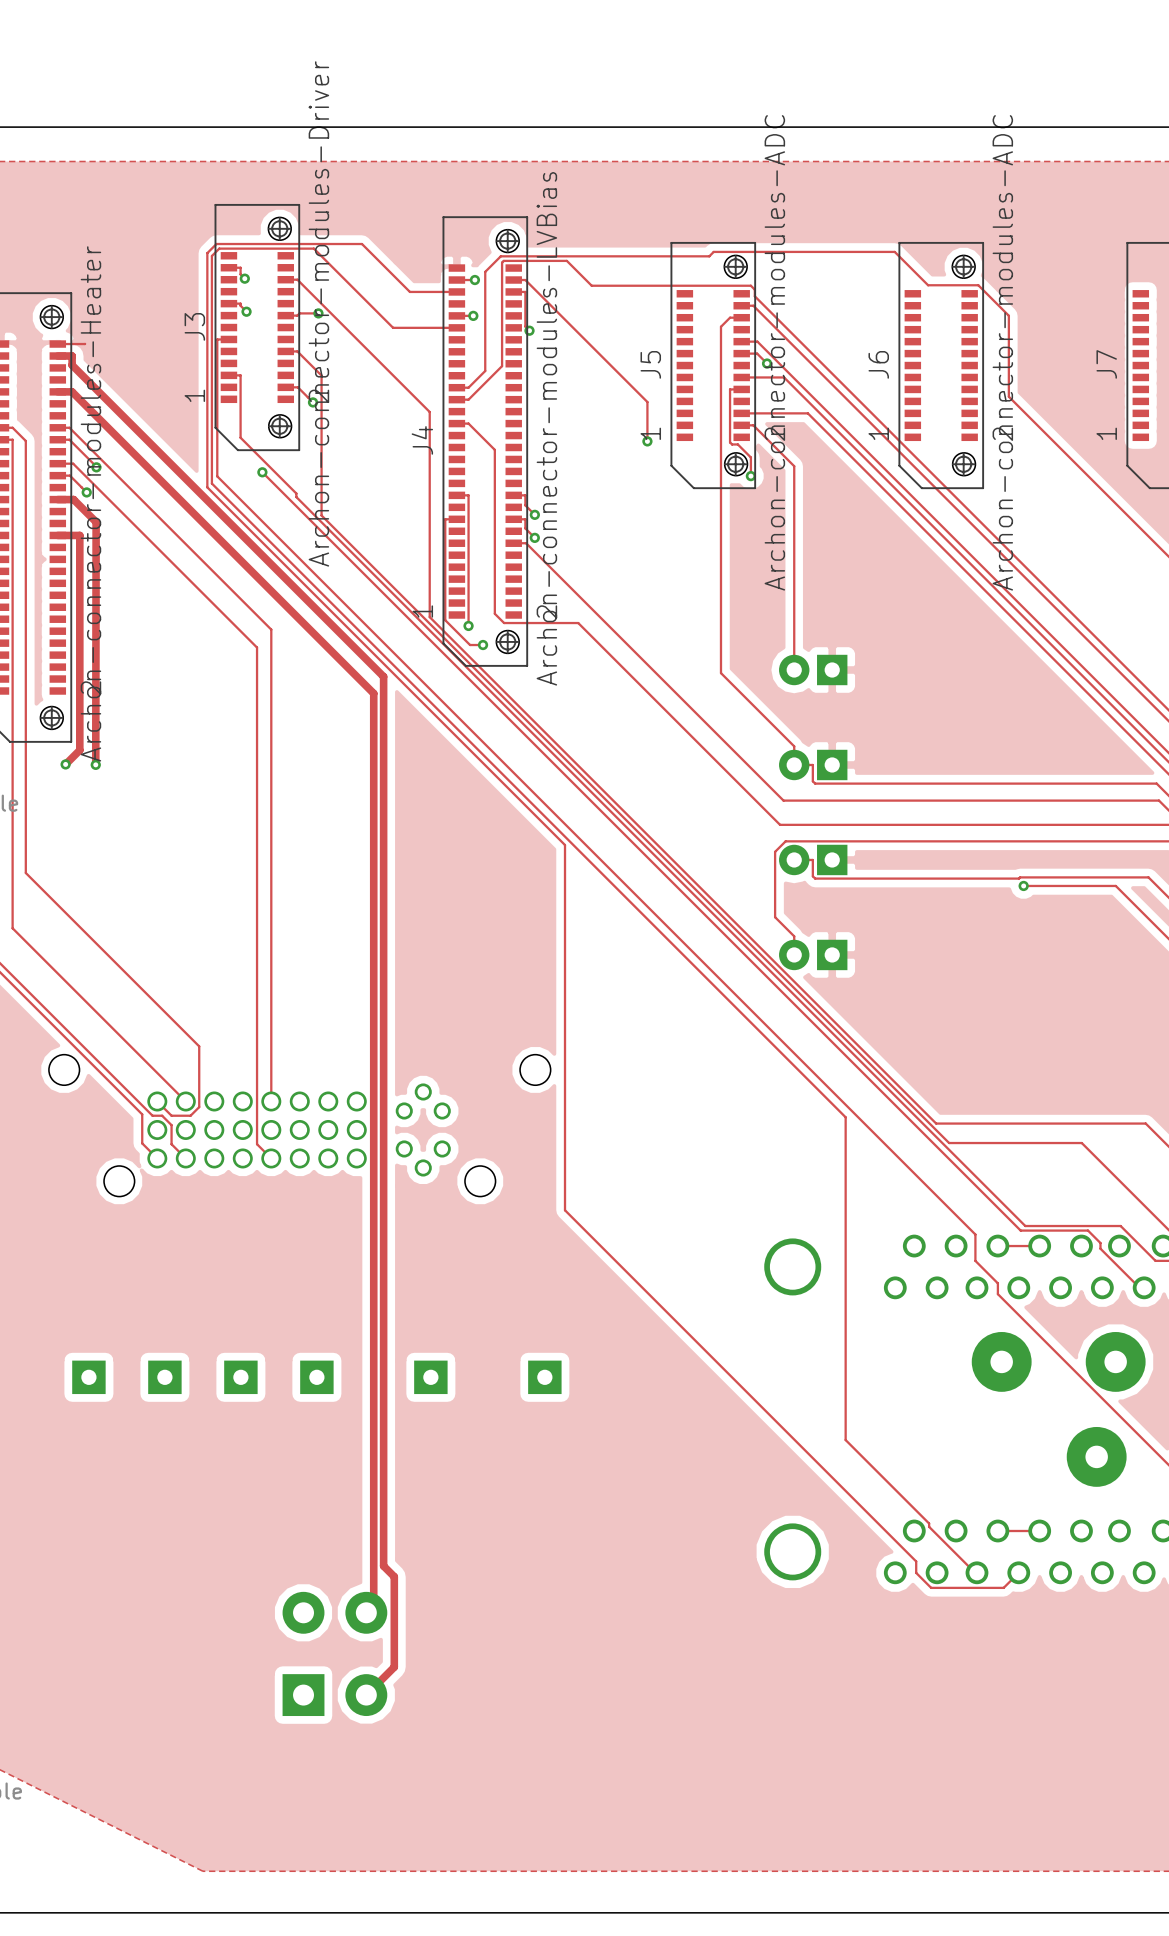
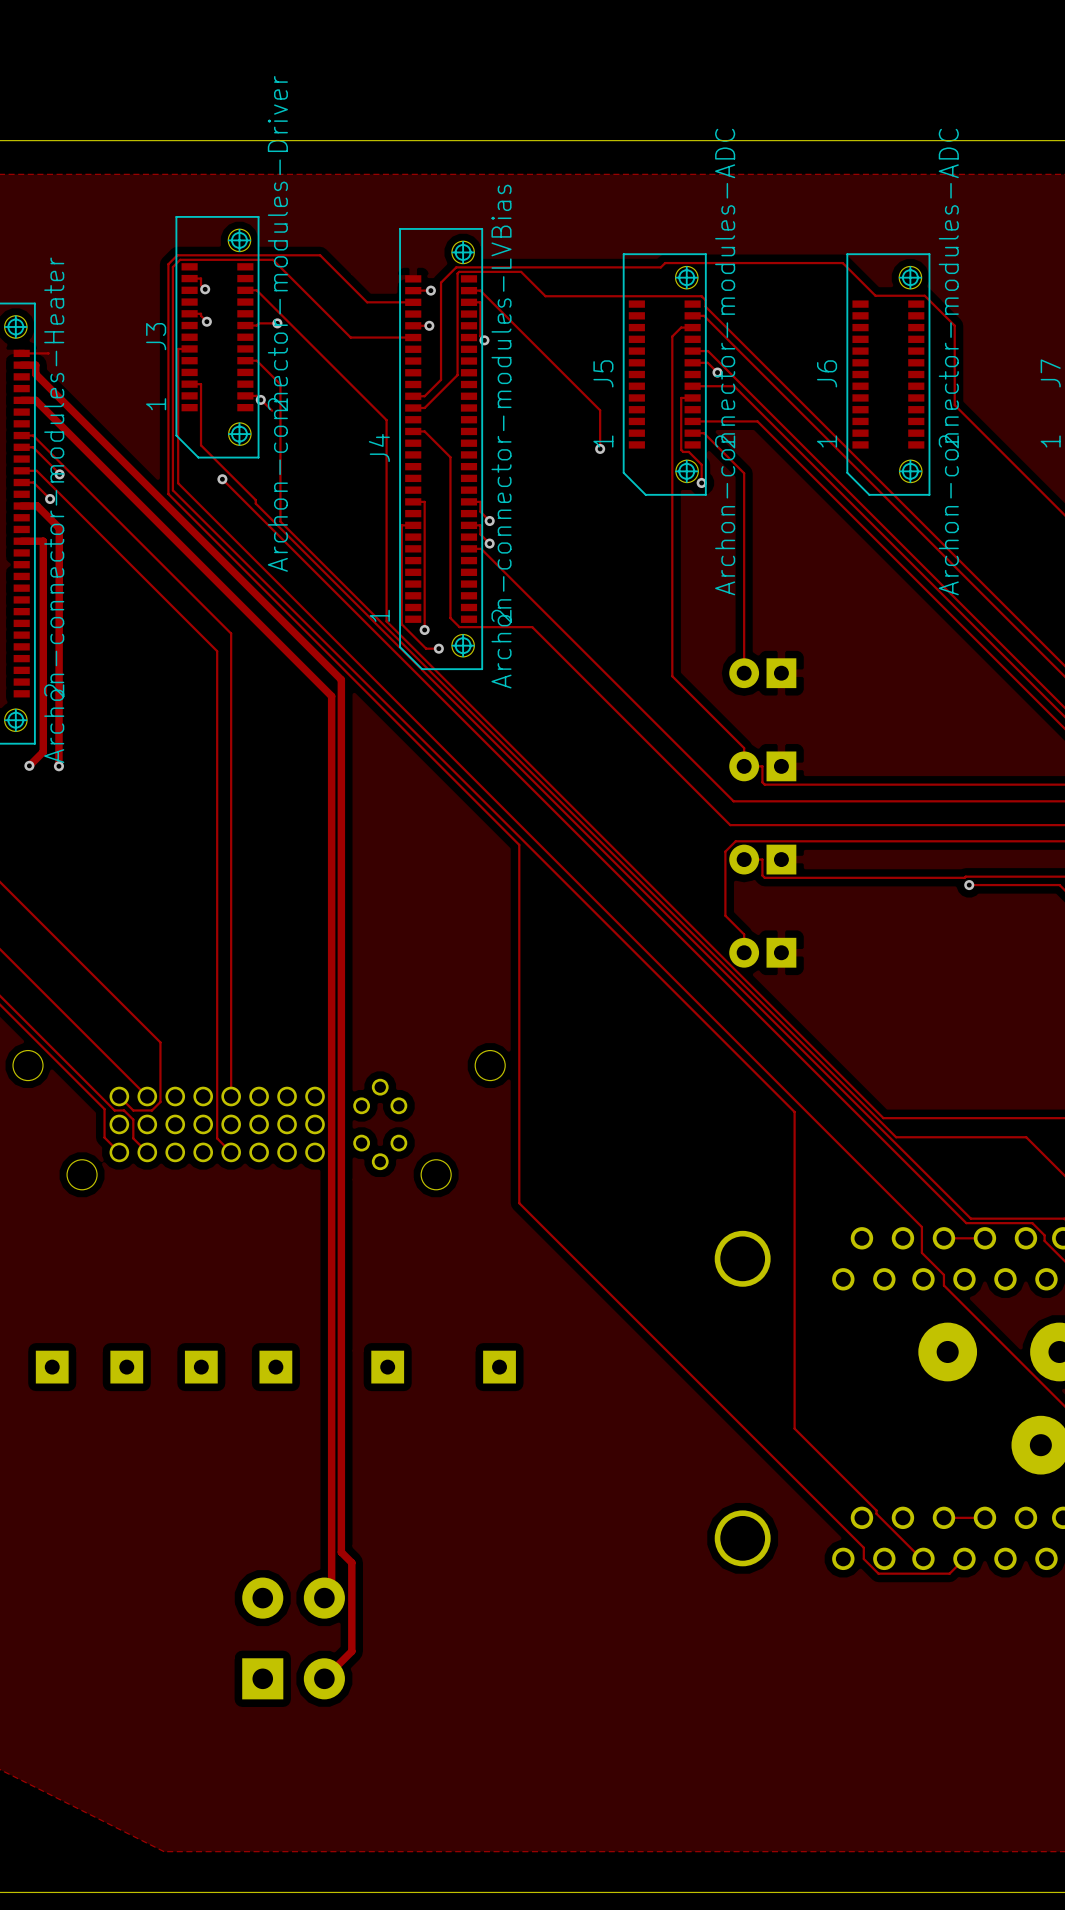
via position: (313, 402) -> (260, 399)

